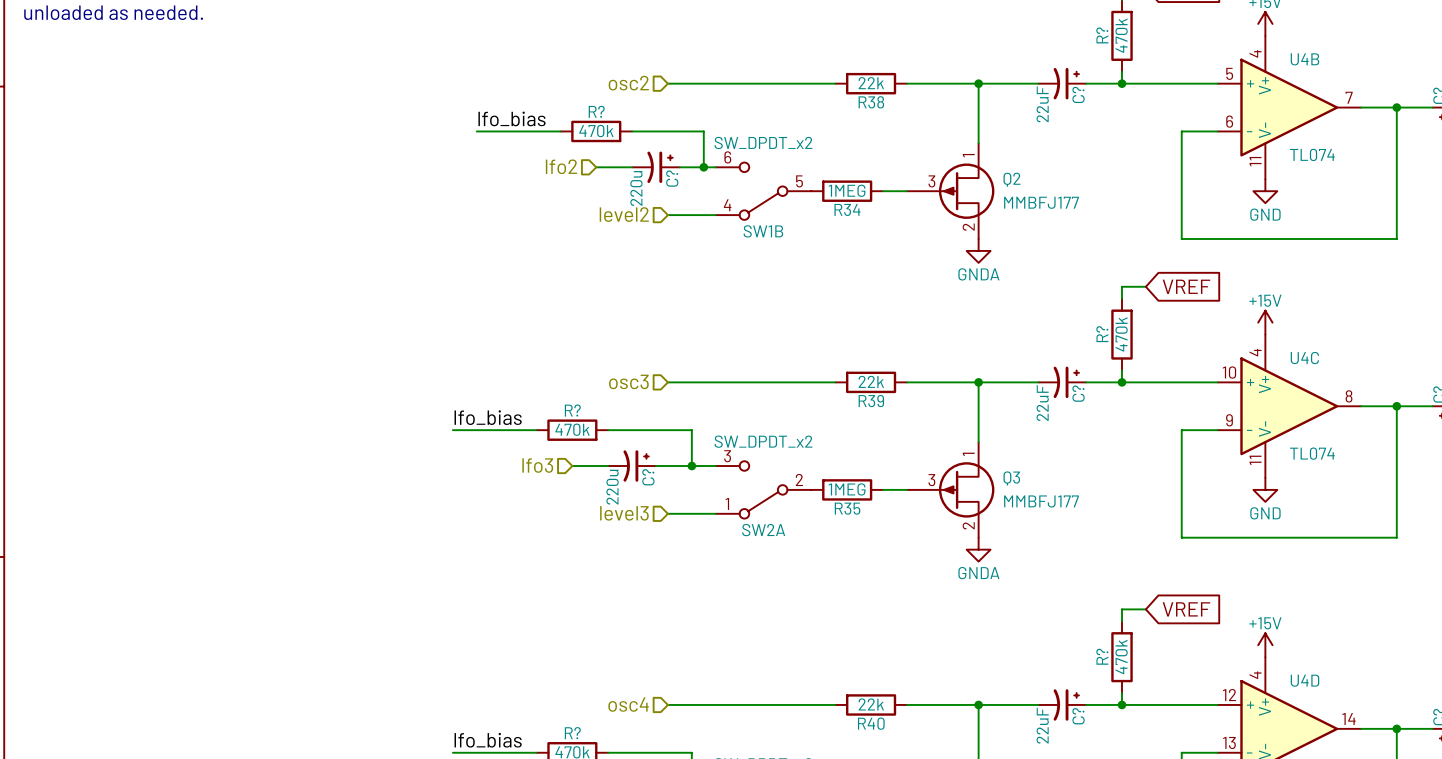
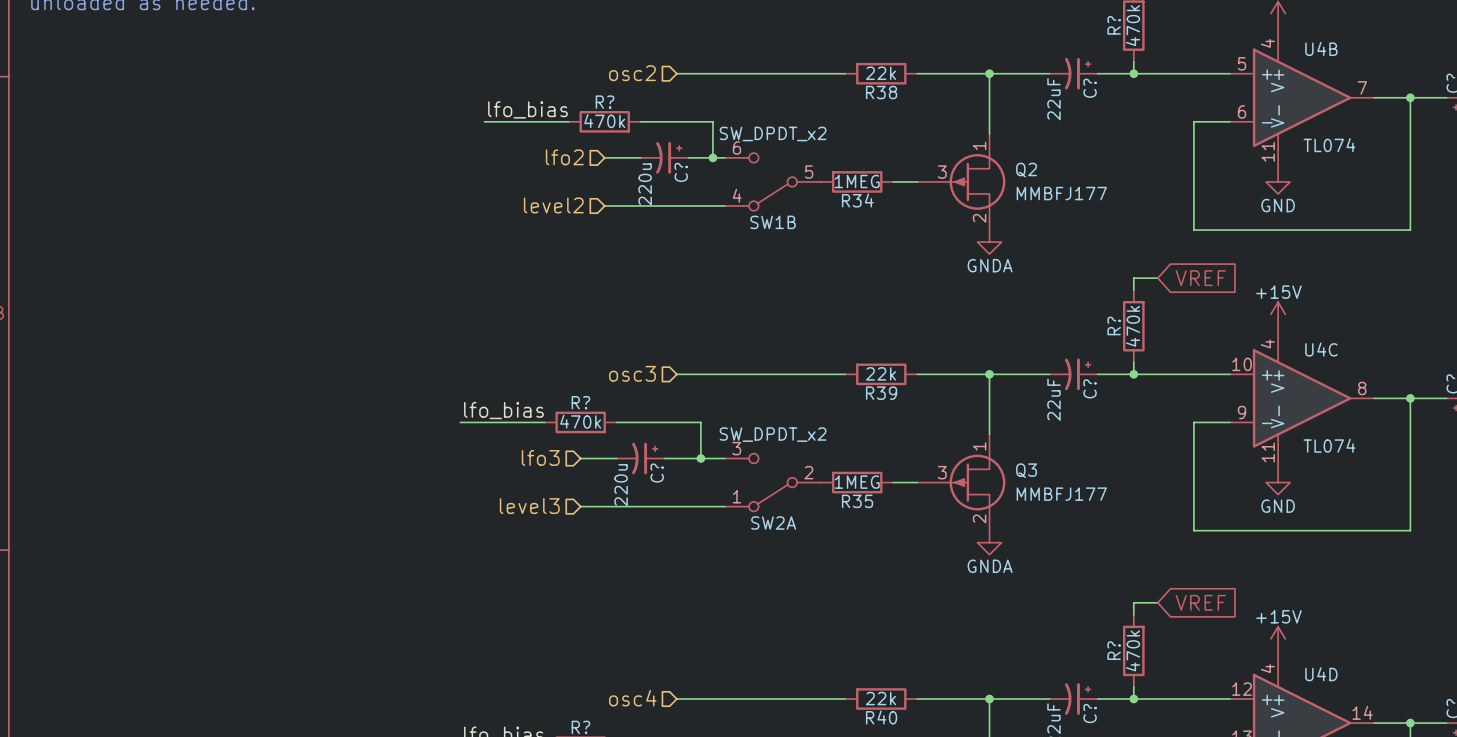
hierarchical label position: level2 (624, 214) -> level2 (553, 205)
wire: none -> (604, 206) (676, 206)
wire: none -> (580, 506) (676, 506)
hierarchical label position: level3 (624, 513) -> level3 (529, 506)

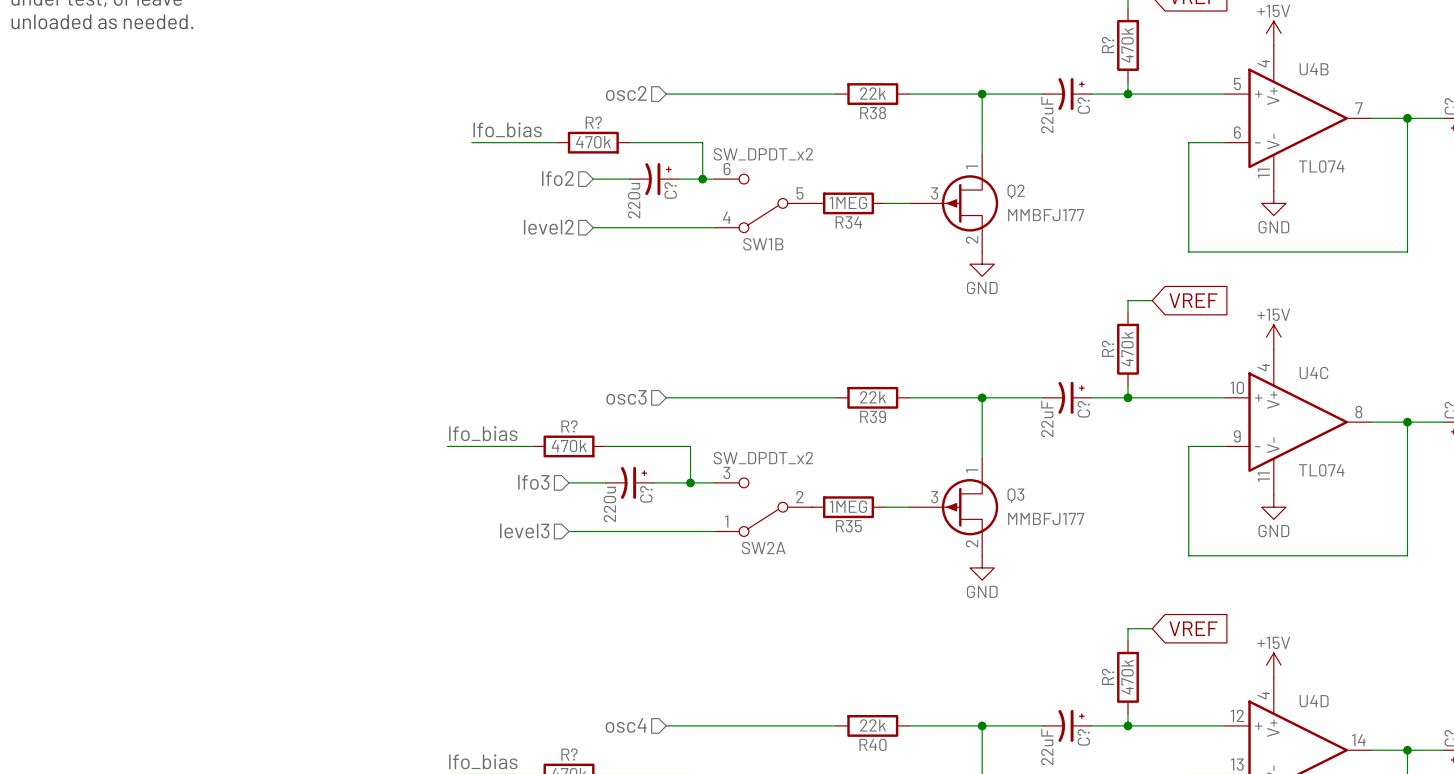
power symbol: GNDA (989, 242) -> GND (982, 264)
power symbol: GNDA (989, 542) -> GND (982, 567)

